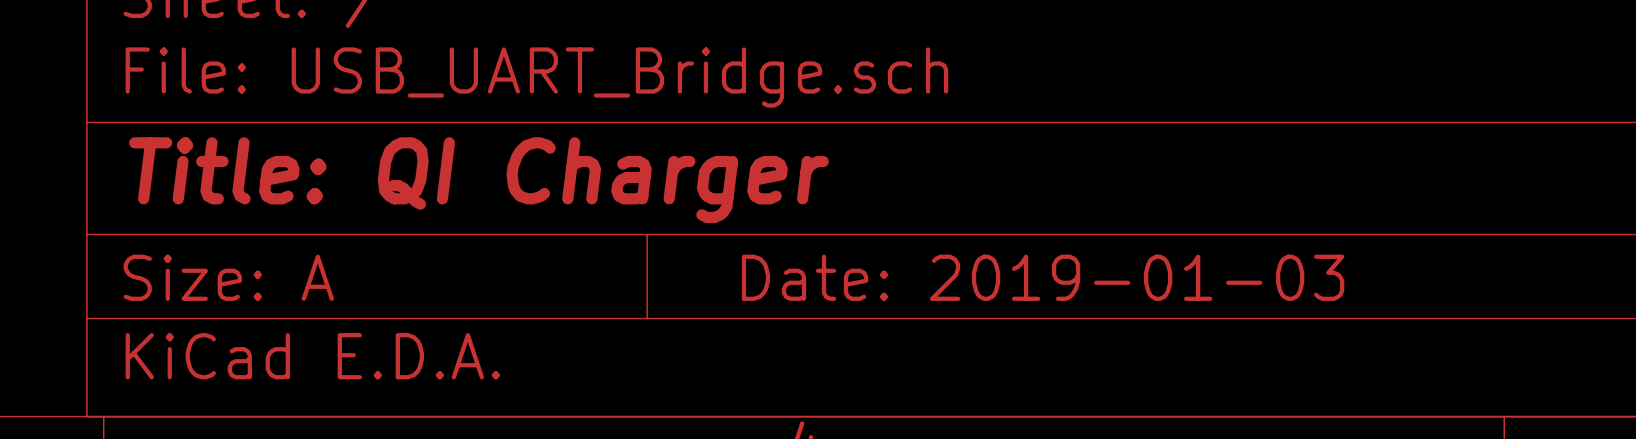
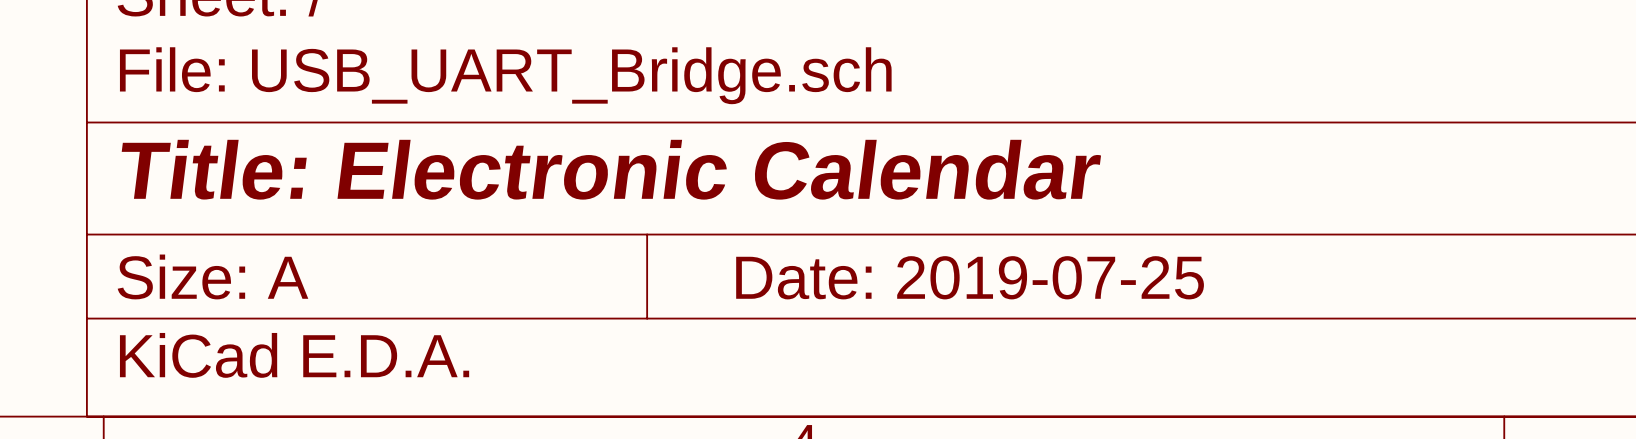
title block: Title: QI Charger (478, 180) -> Title: Electronic Calendar (611, 169)
title block: Date: 2019-01-03 (1043, 277) -> Date: 2019-07-25 (970, 277)

